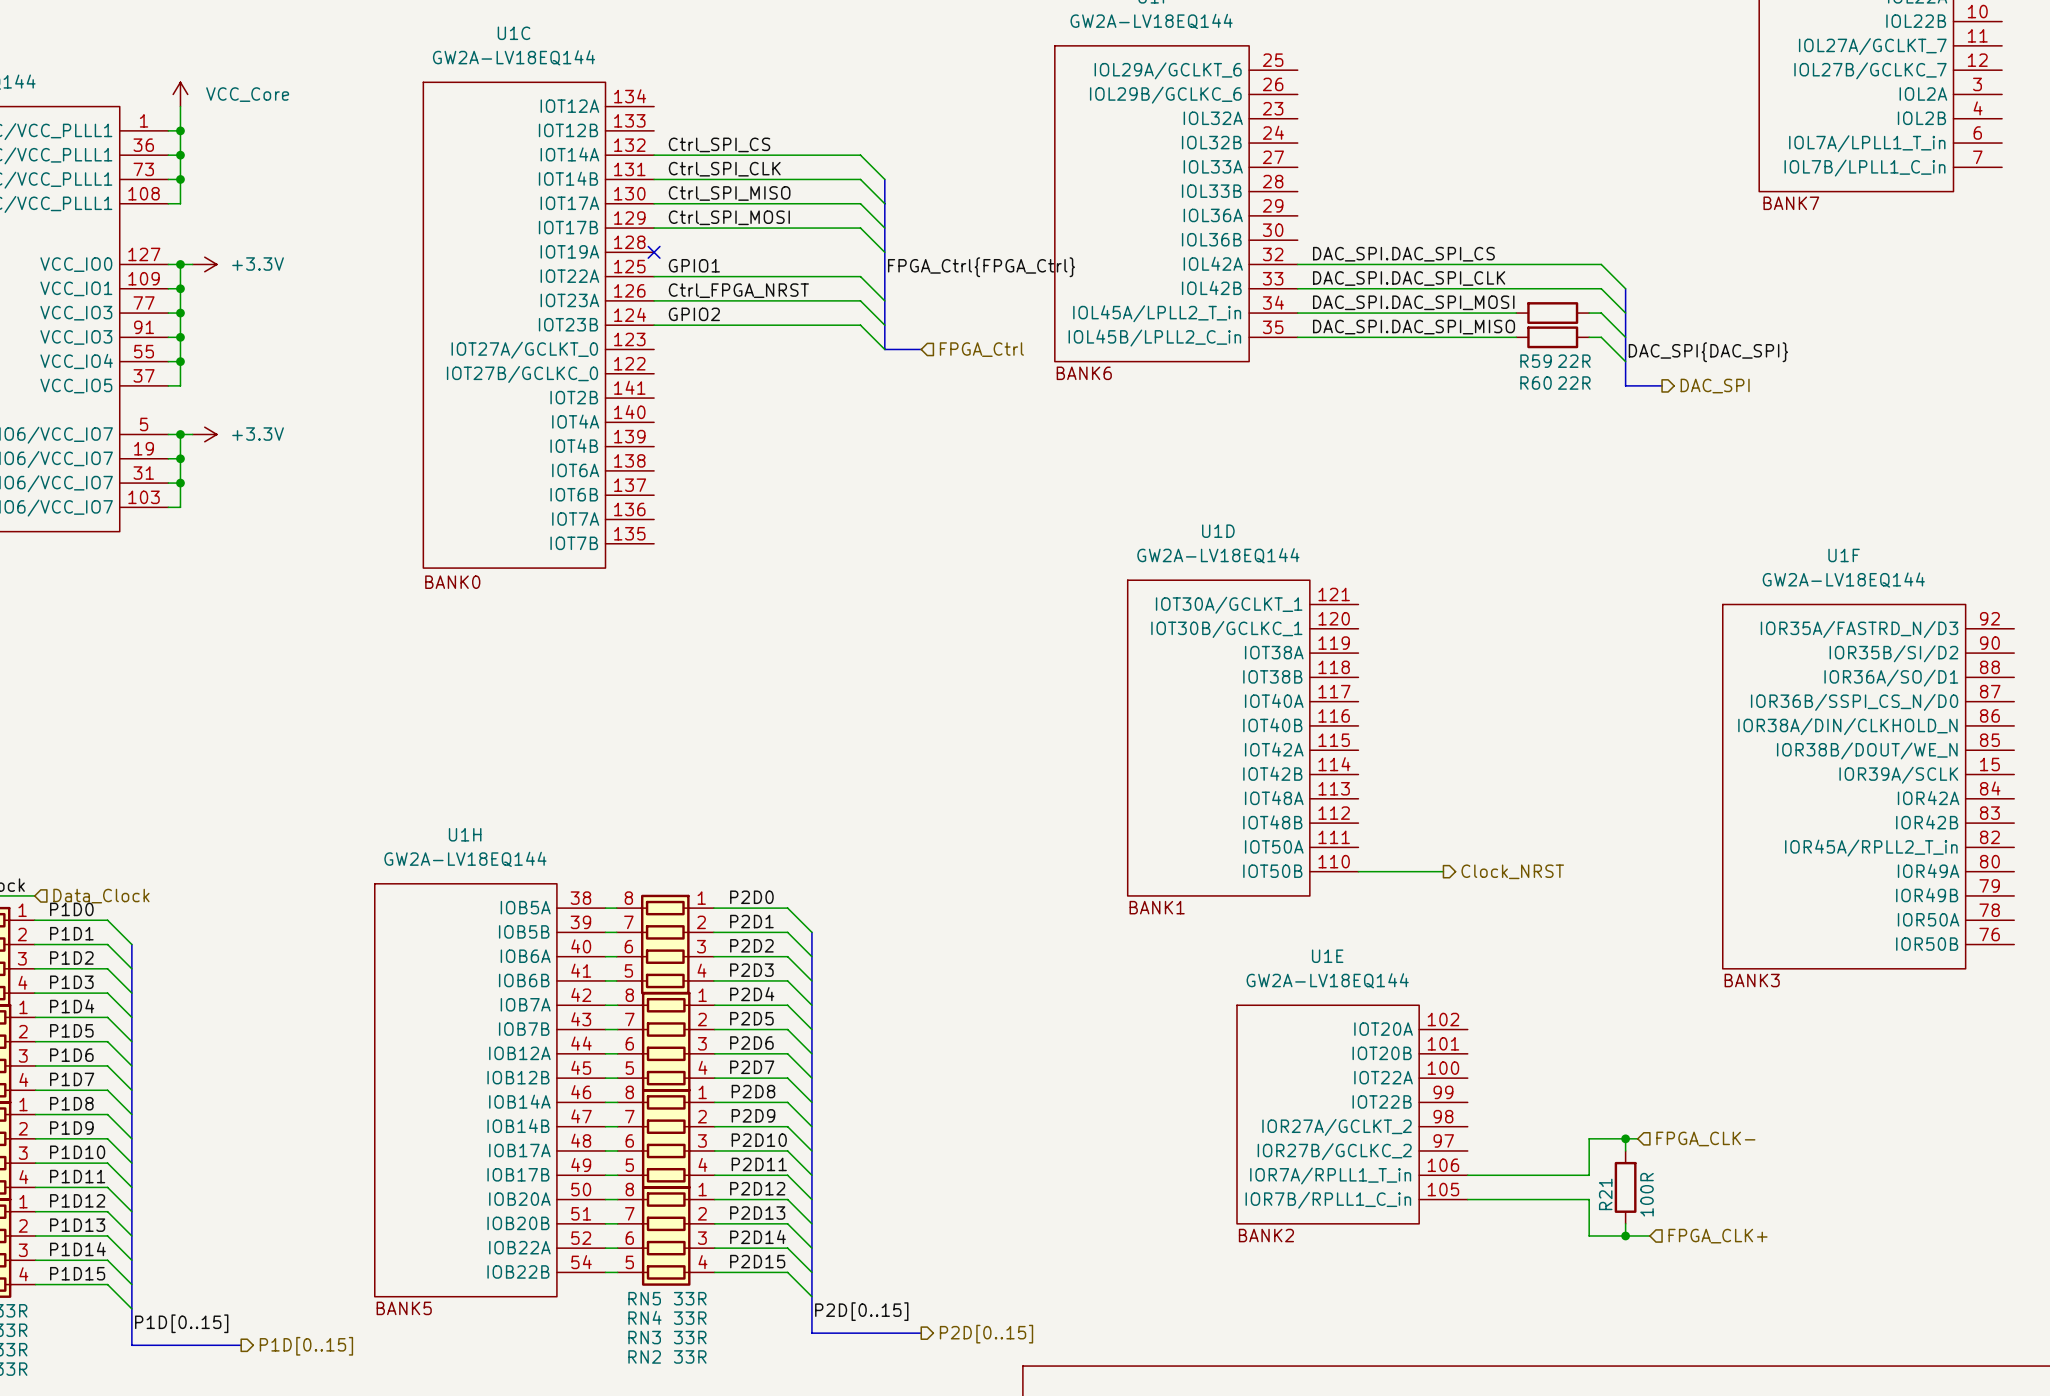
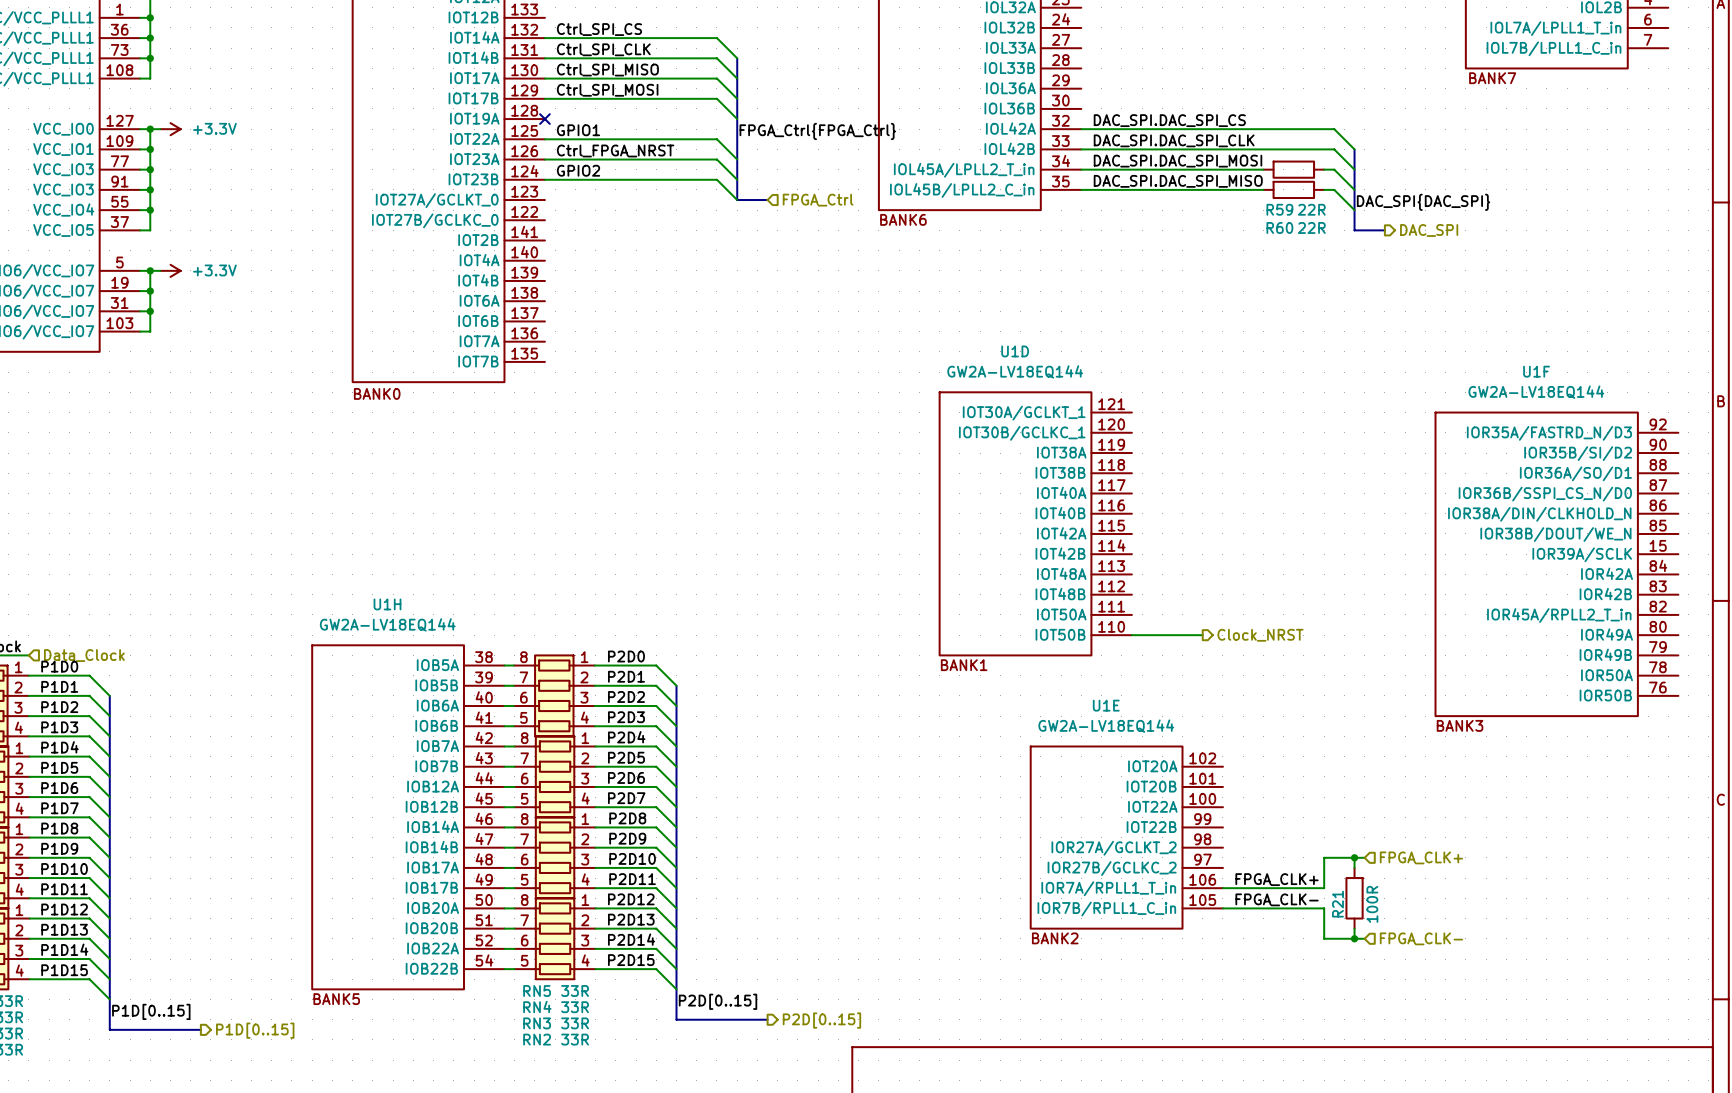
hierarchical label: FPGA_CLK- (1705, 1138) -> FPGA_CLK+ (1421, 857)
label: none -> FPGA_CLK+ (1277, 879)
label: none -> FPGA_CLK- (1277, 899)
wire: (1637, 1235) (1649, 1235) -> none
hierarchical label: FPGA_CLK+ (1718, 1236) -> FPGA_CLK- (1421, 938)

